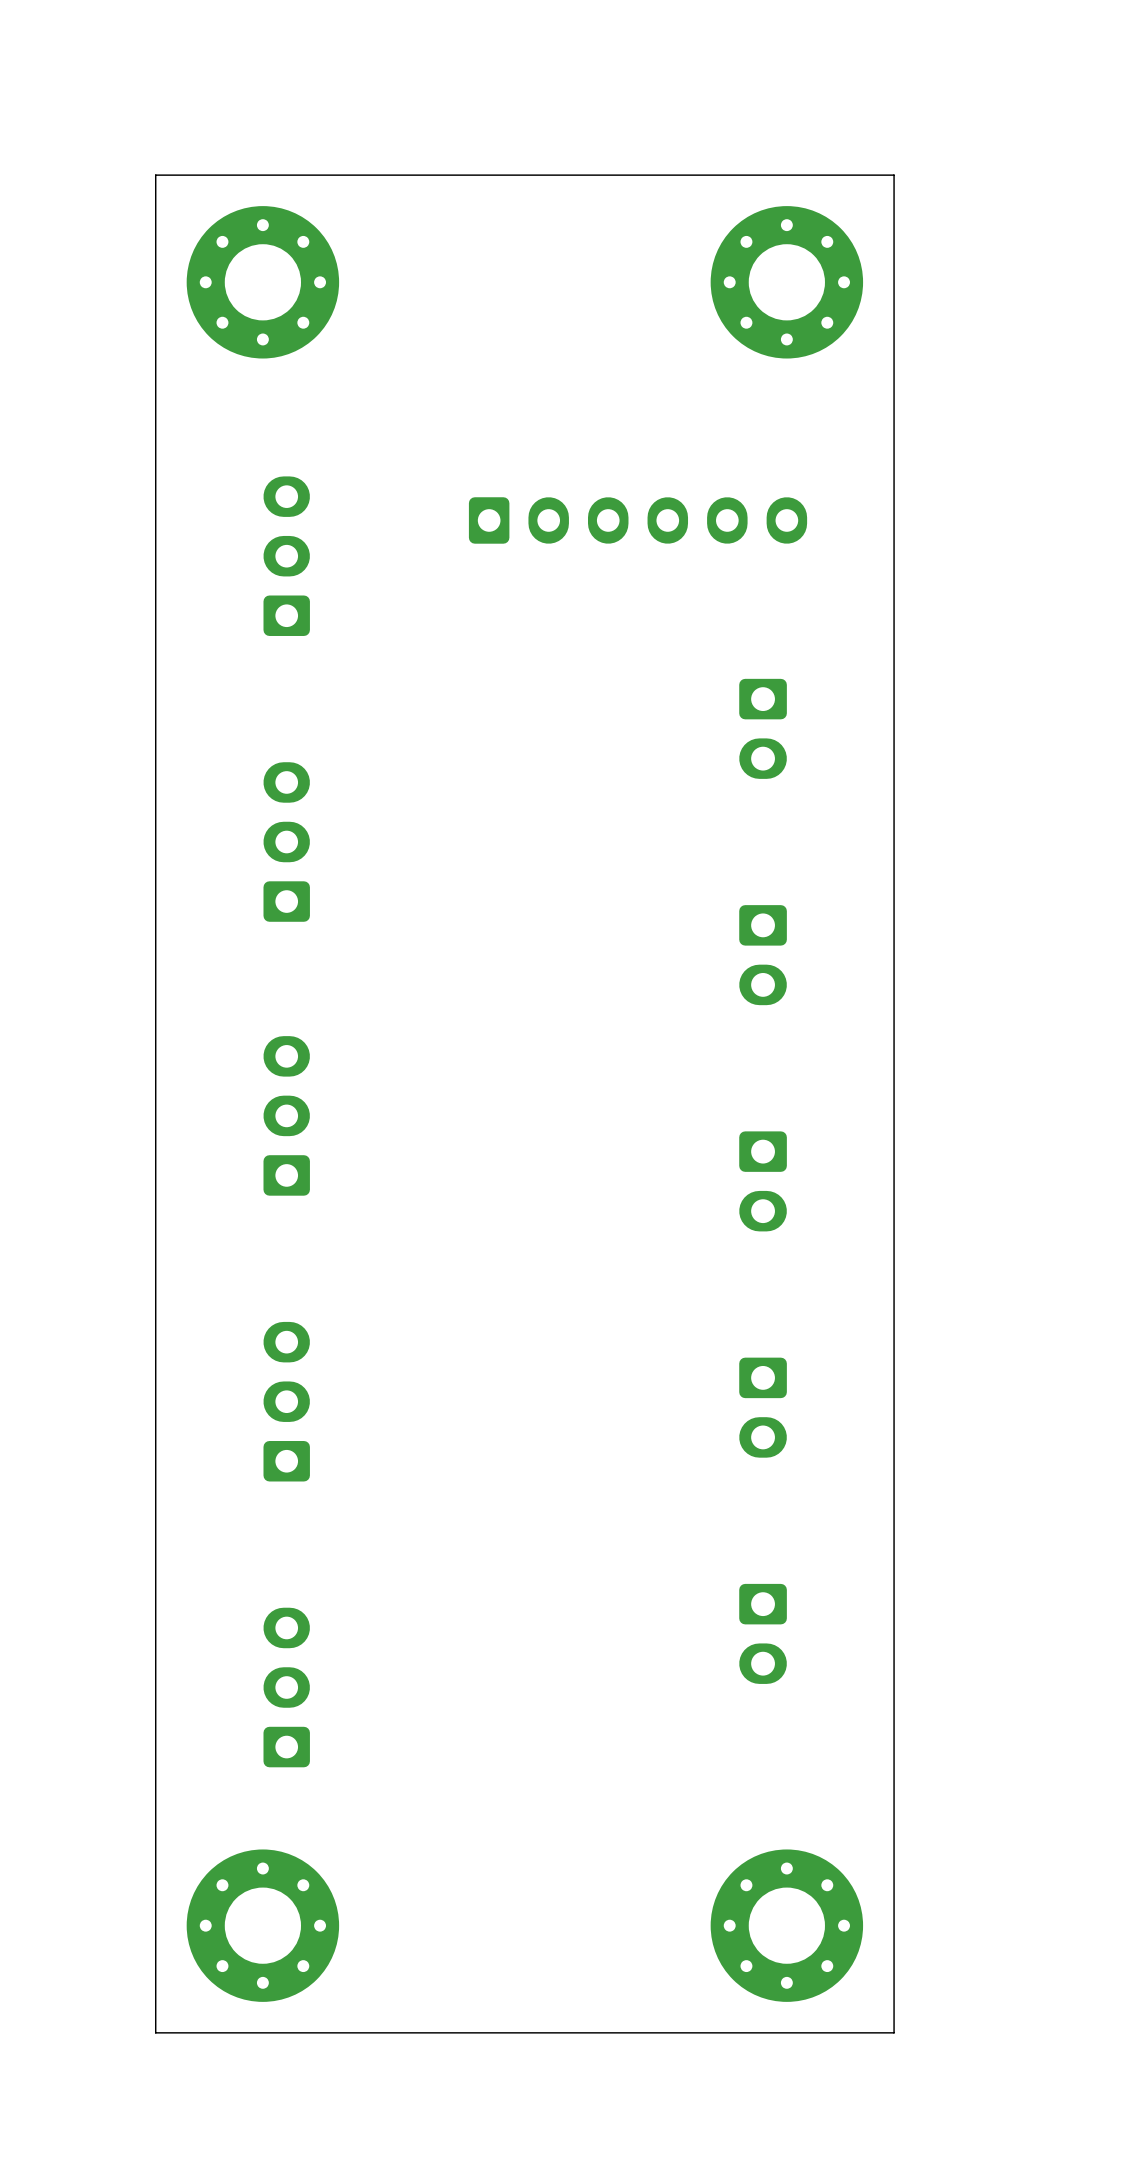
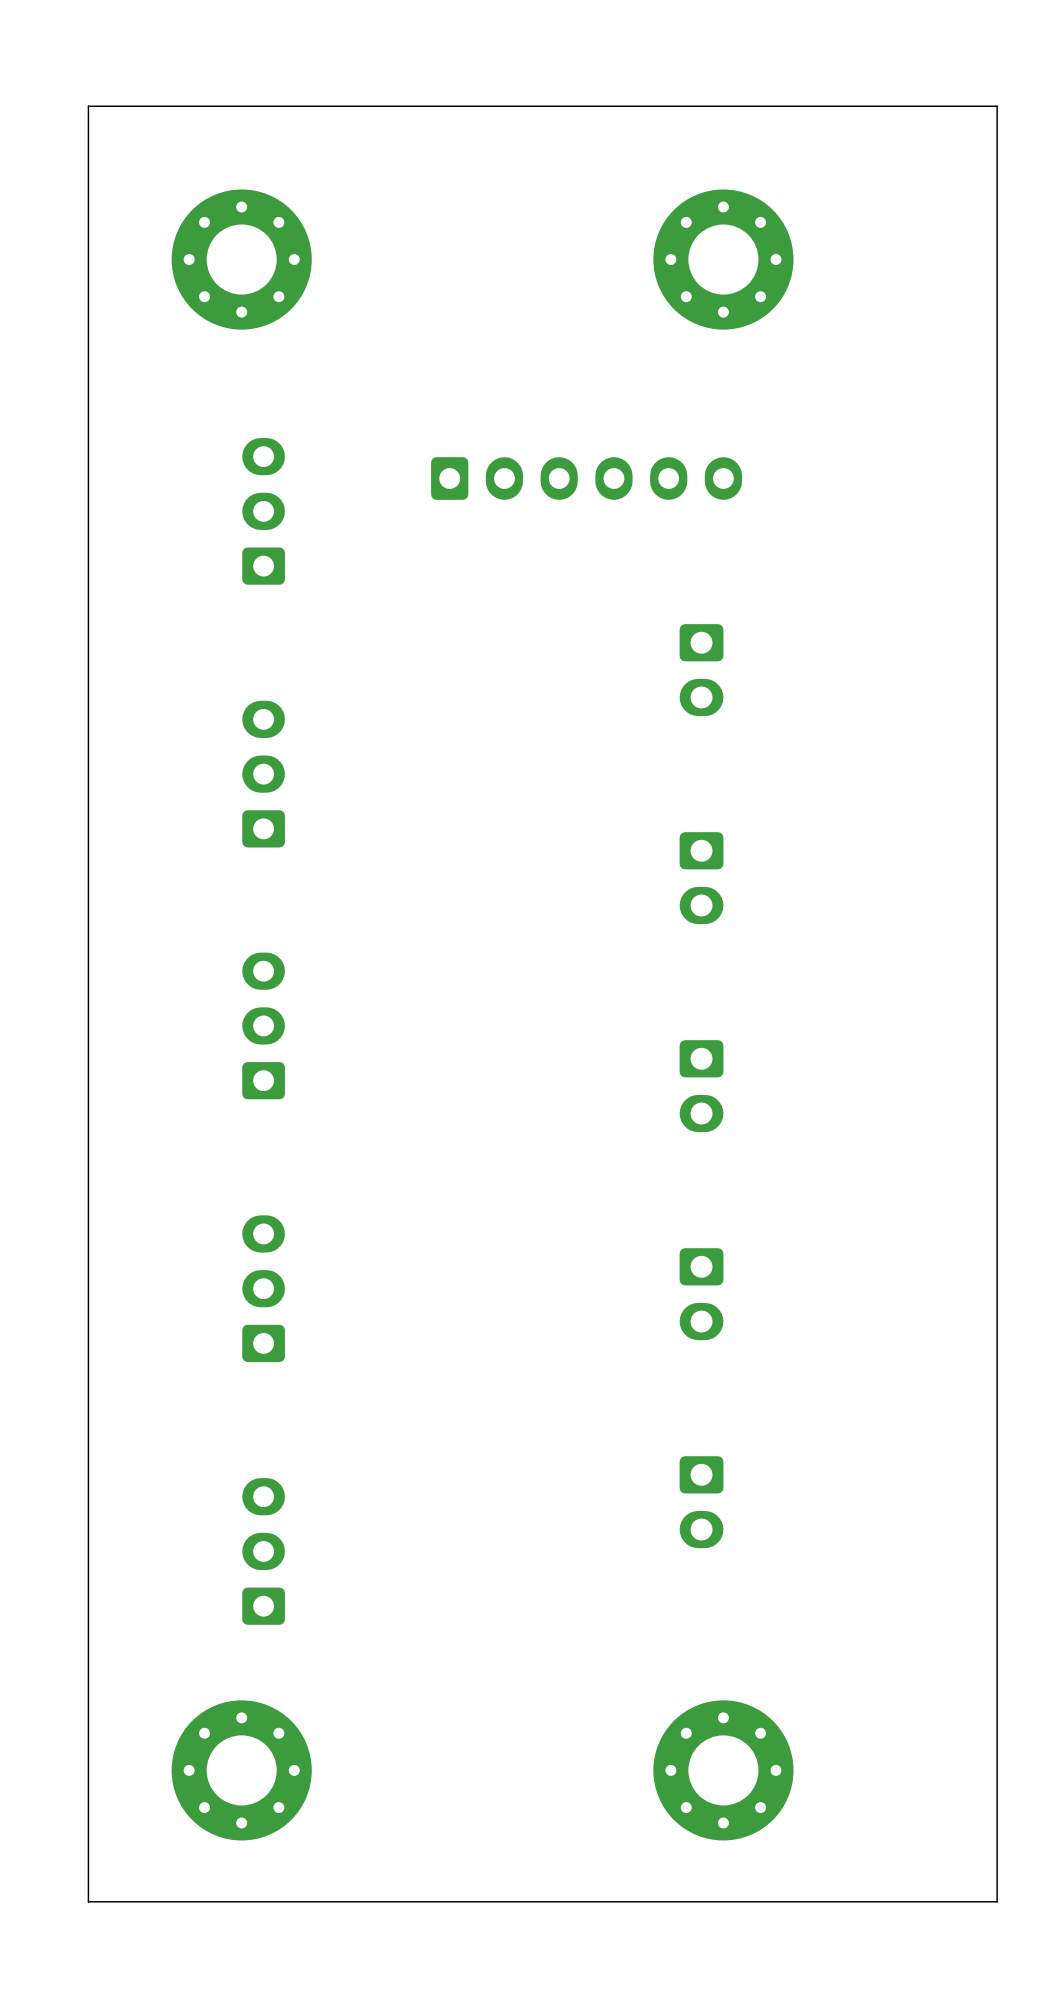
board edge: (894, 175) (155, 175) (155, 2032) (894, 2032) (894, 175) -> (997, 106) (997, 1901) (88, 1901) (88, 106) (997, 106)

